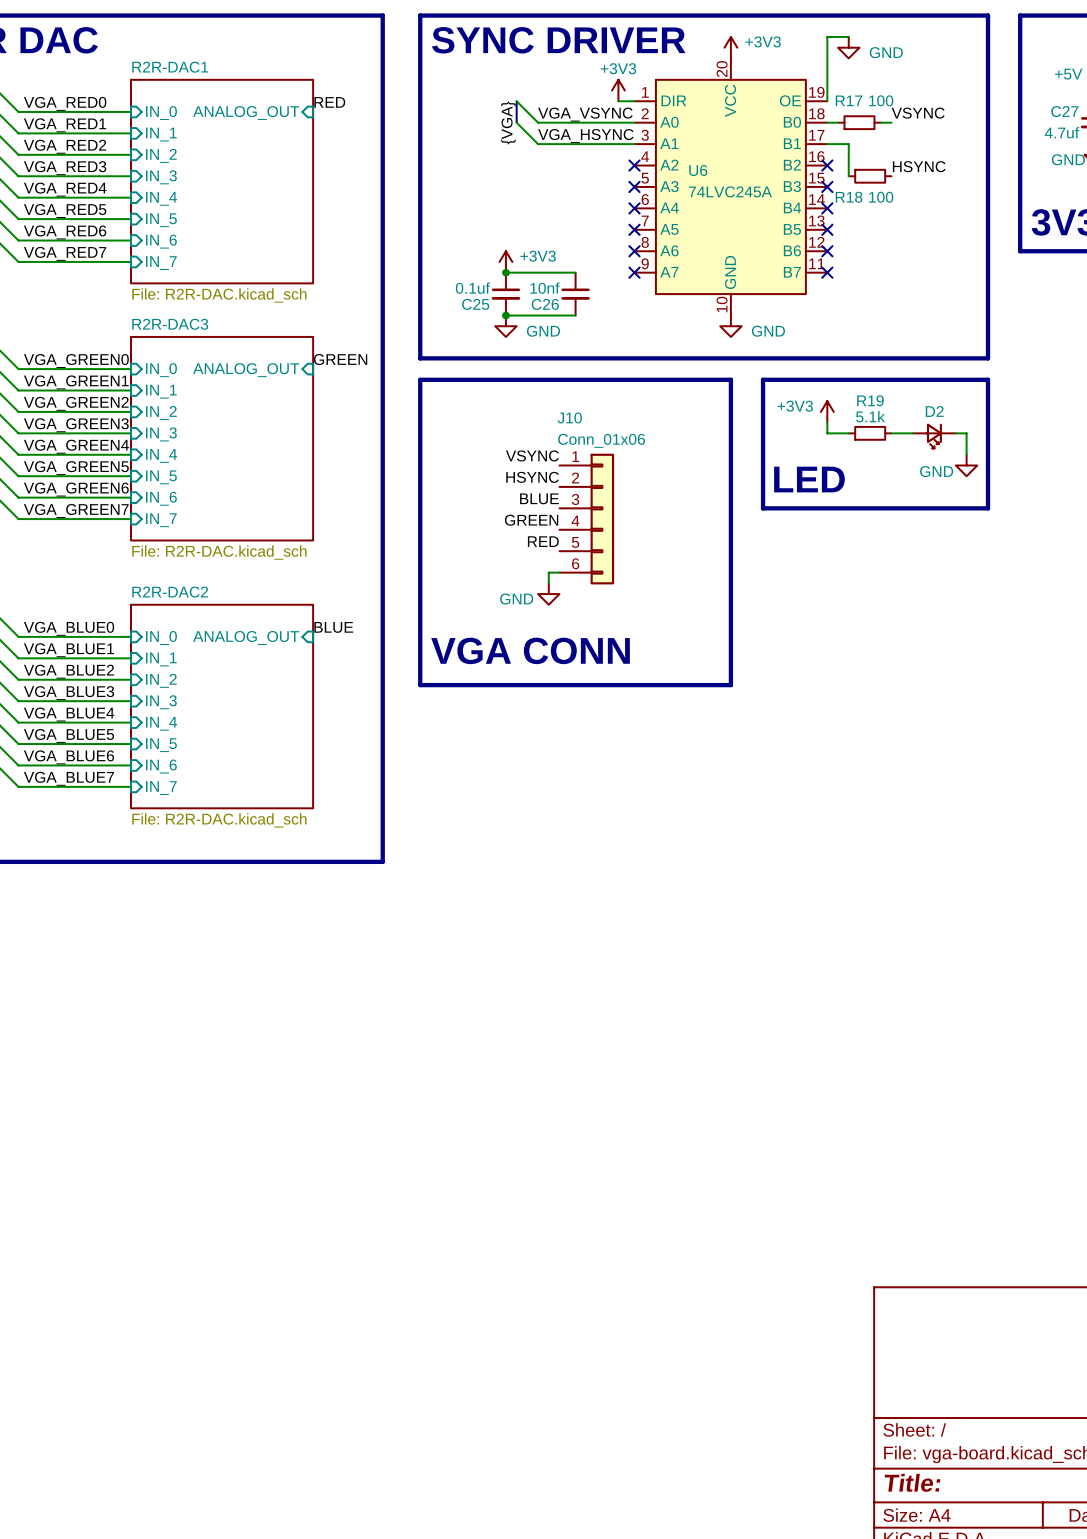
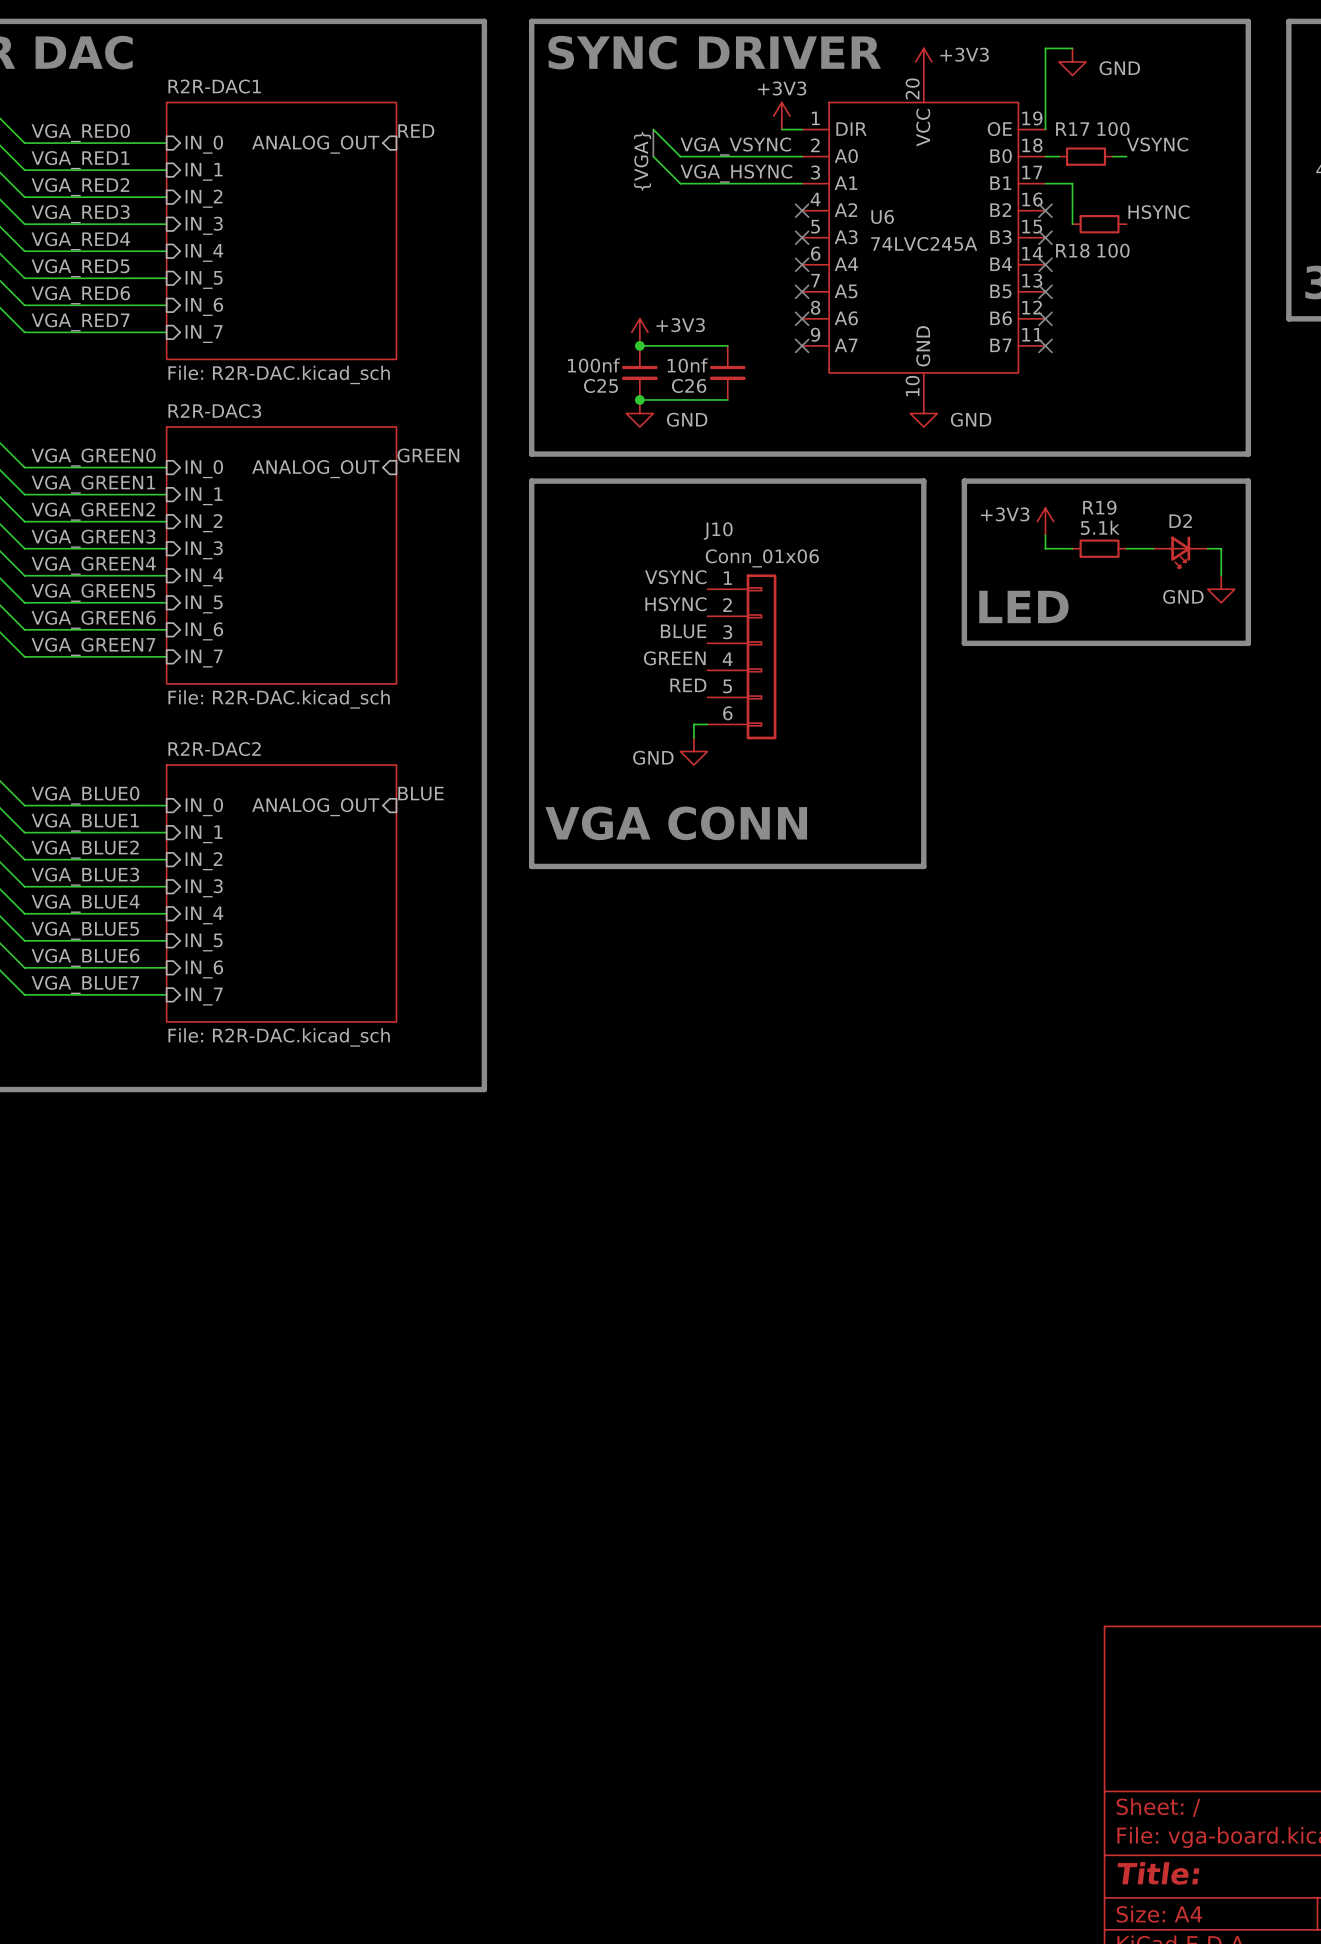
C25 value: 0.1uf (472, 288) -> 100nf (593, 365)

